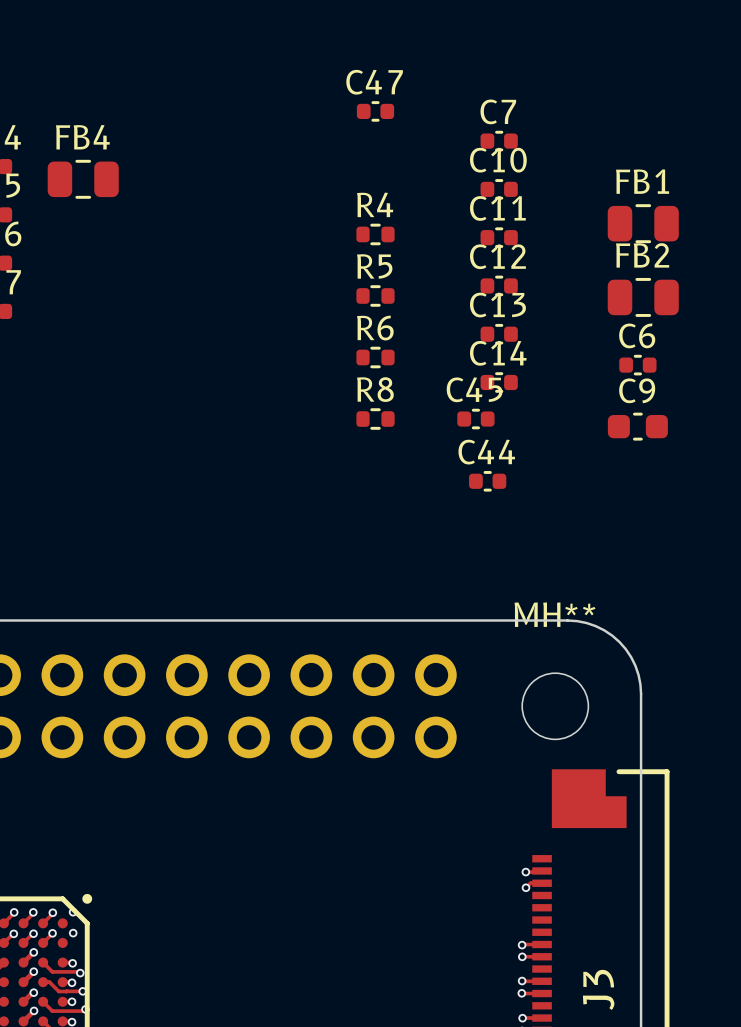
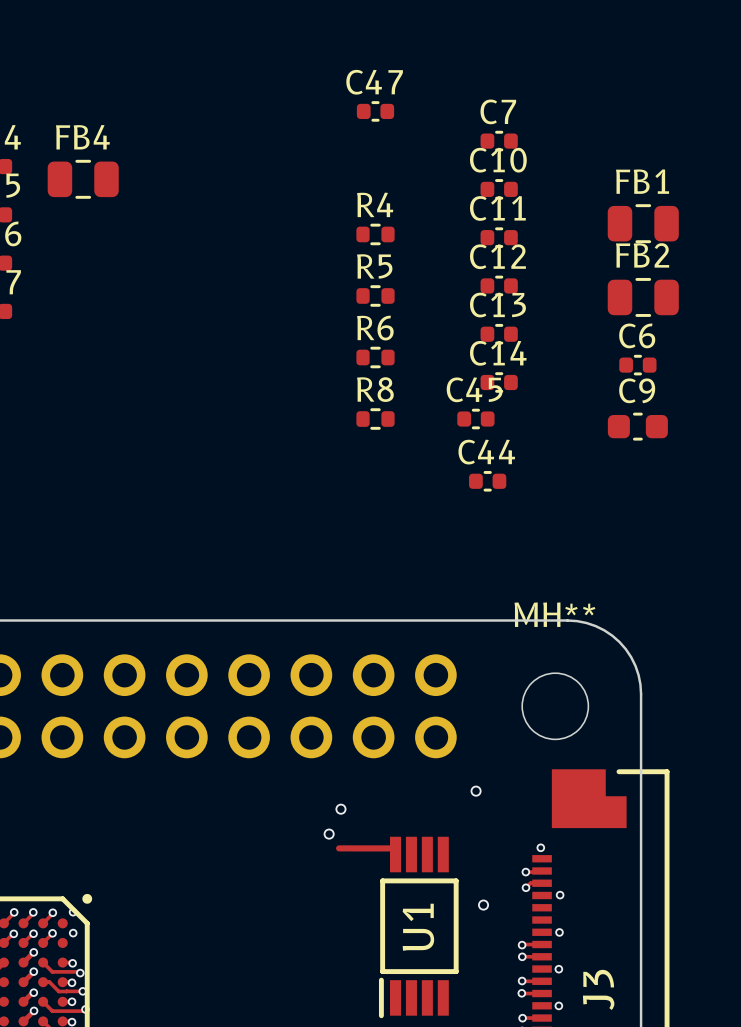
via: none -> (476, 791)
via: none -> (340, 809)
via: none -> (329, 834)
via: none -> (540, 847)
track: none -> (339, 848) (389, 848)
via: none -> (560, 895)
via: none -> (483, 905)
U1: none -> (418, 927)
via: none -> (559, 932)
via: none -> (558, 969)
via: none -> (558, 1005)

